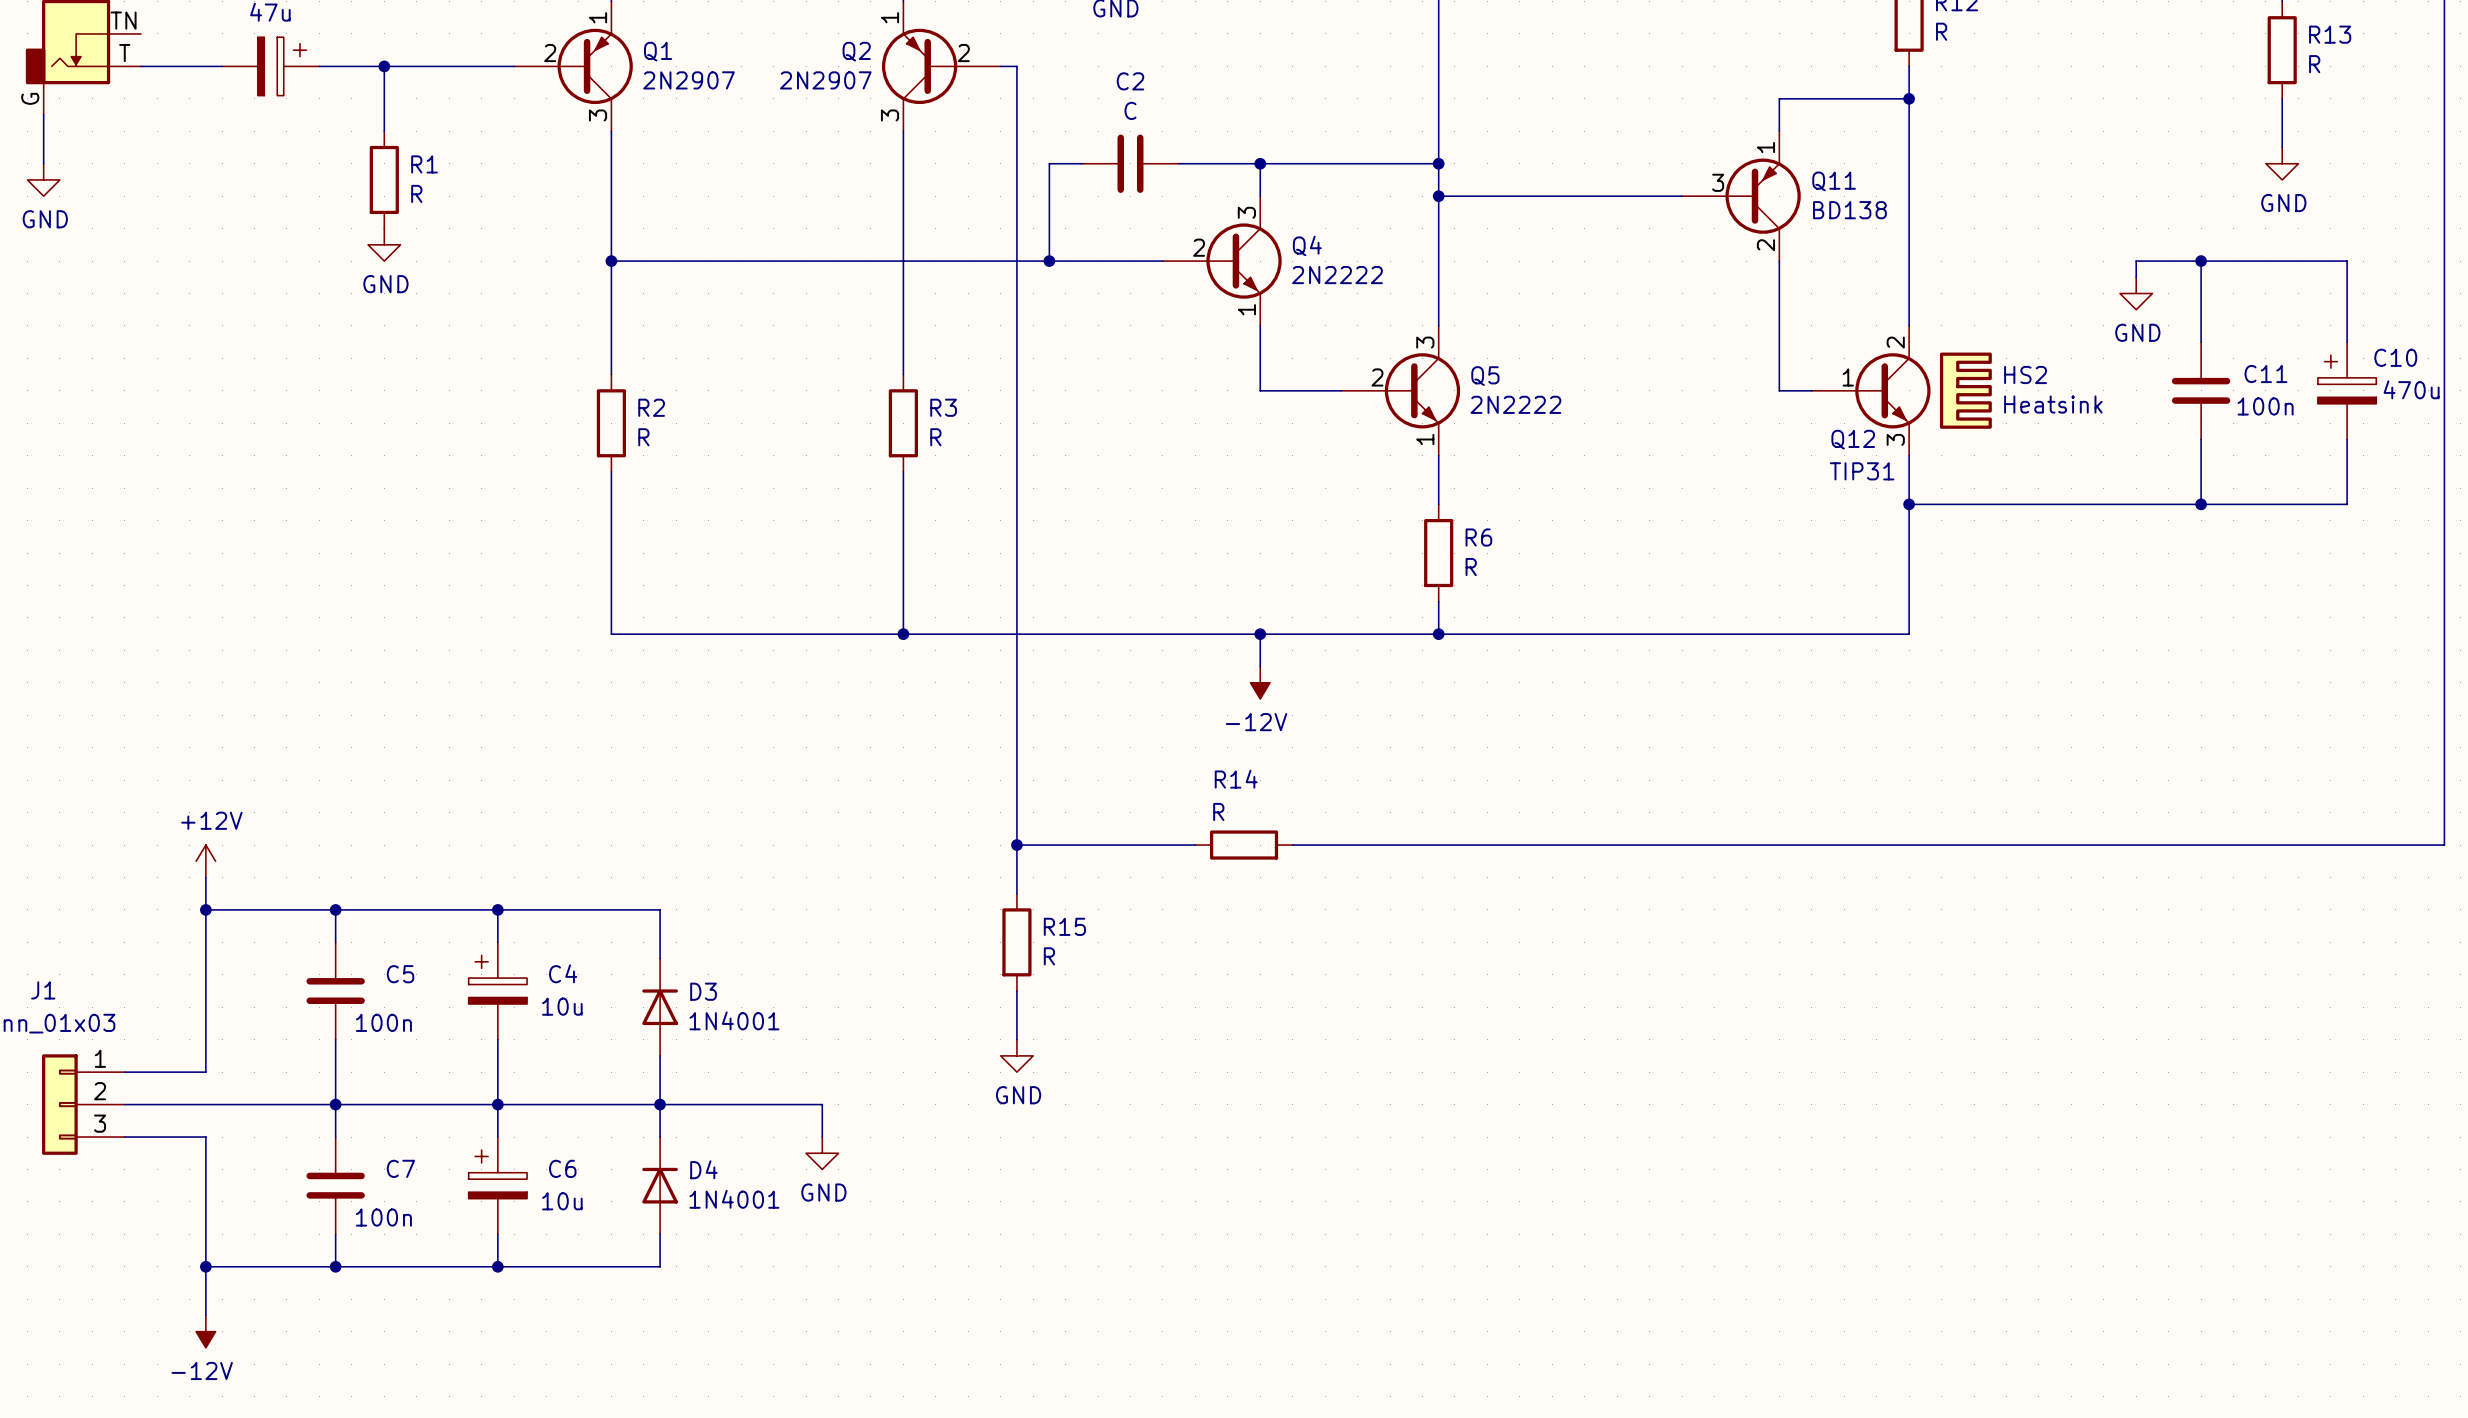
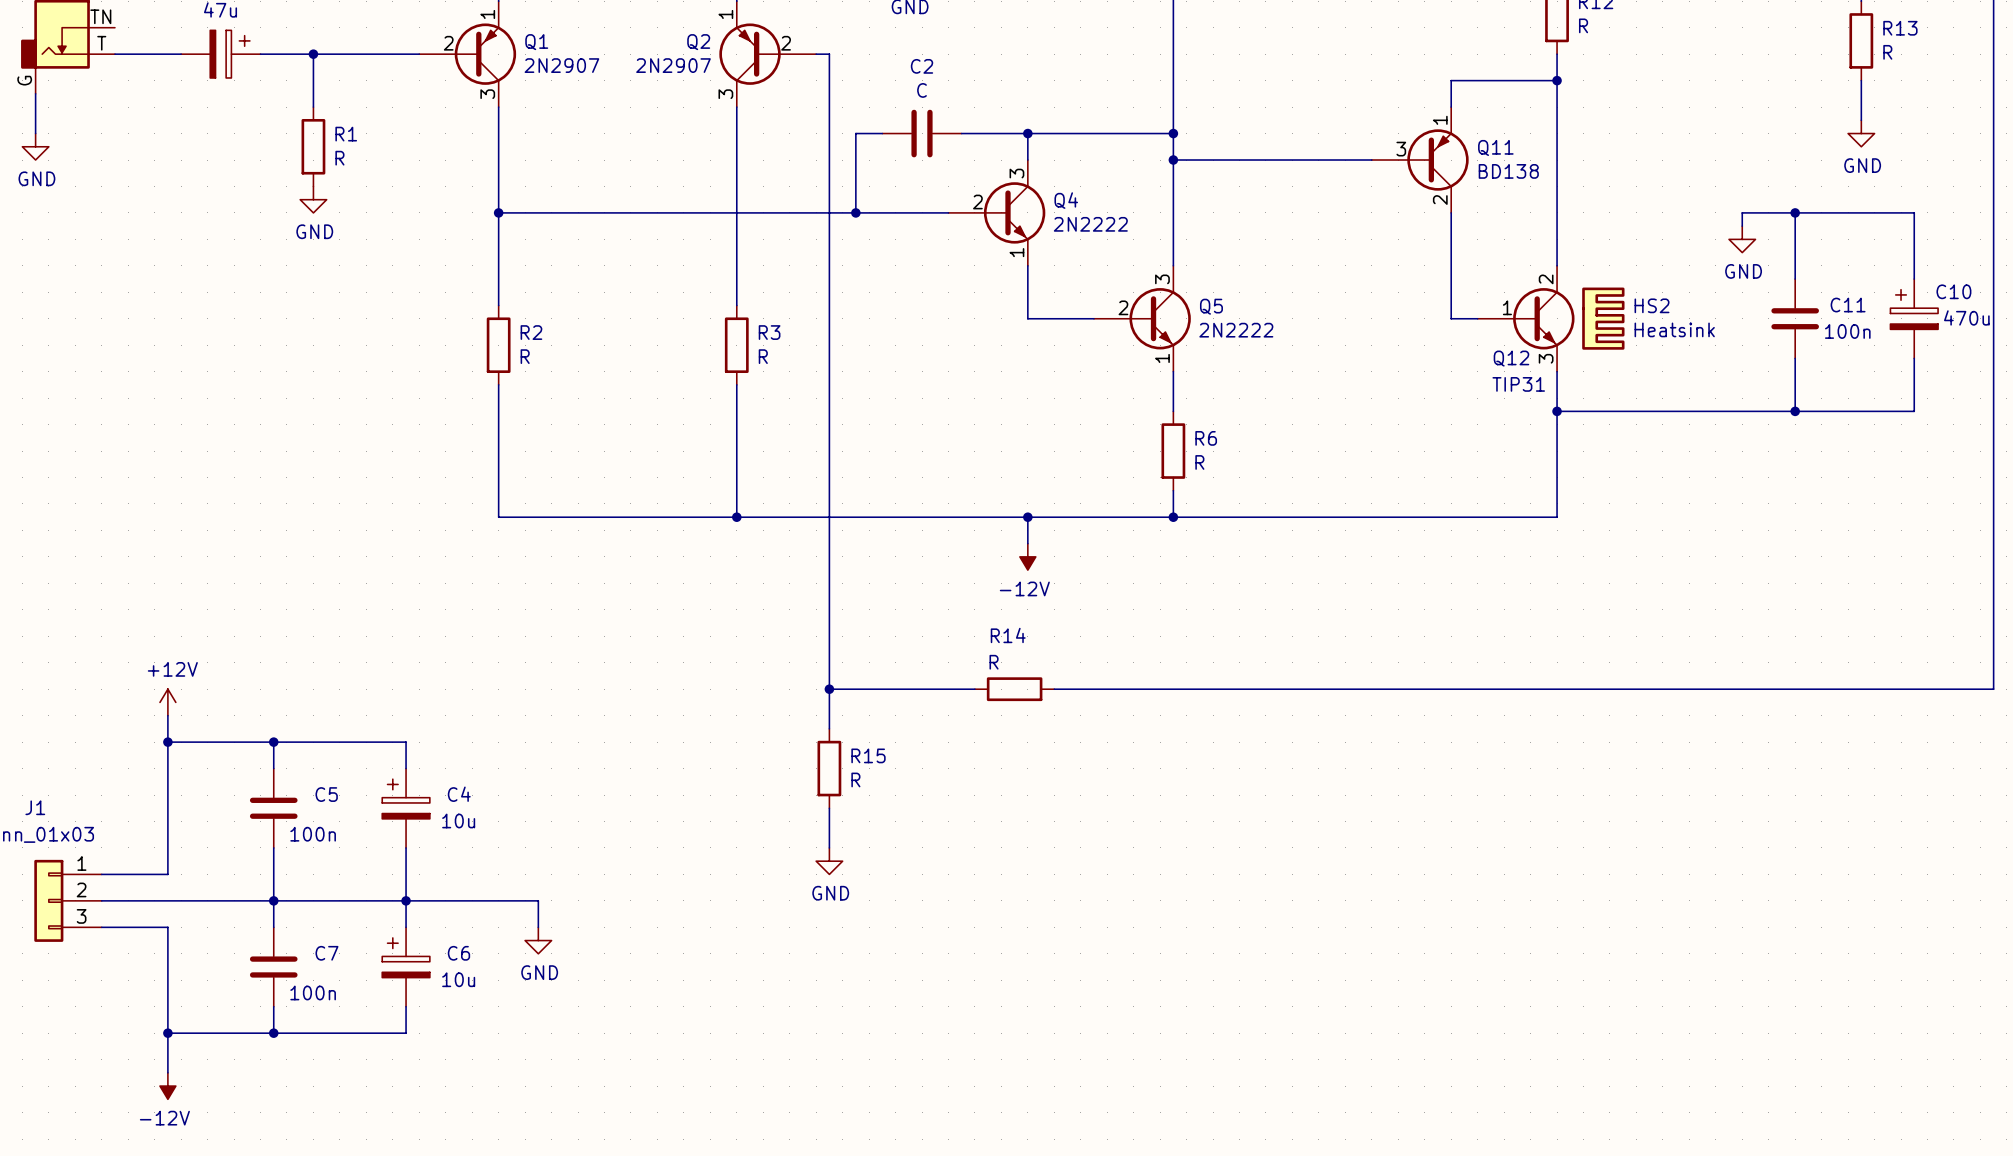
wire: (497, 909) (660, 909) (660, 958) -> none
junction: (497, 909) -> none
D3: 1N4001 (660, 1007) -> none
wire: (660, 1055) (660, 1104) (822, 1104) (822, 1137) -> none
junction: (660, 1104) -> none
power symbol position: GND (822, 1153) -> GND (538, 940)
D4: 1N4001 (660, 1185) -> none
wire: (660, 1234) (660, 1266) (497, 1266) -> none
junction: (497, 1266) -> none

